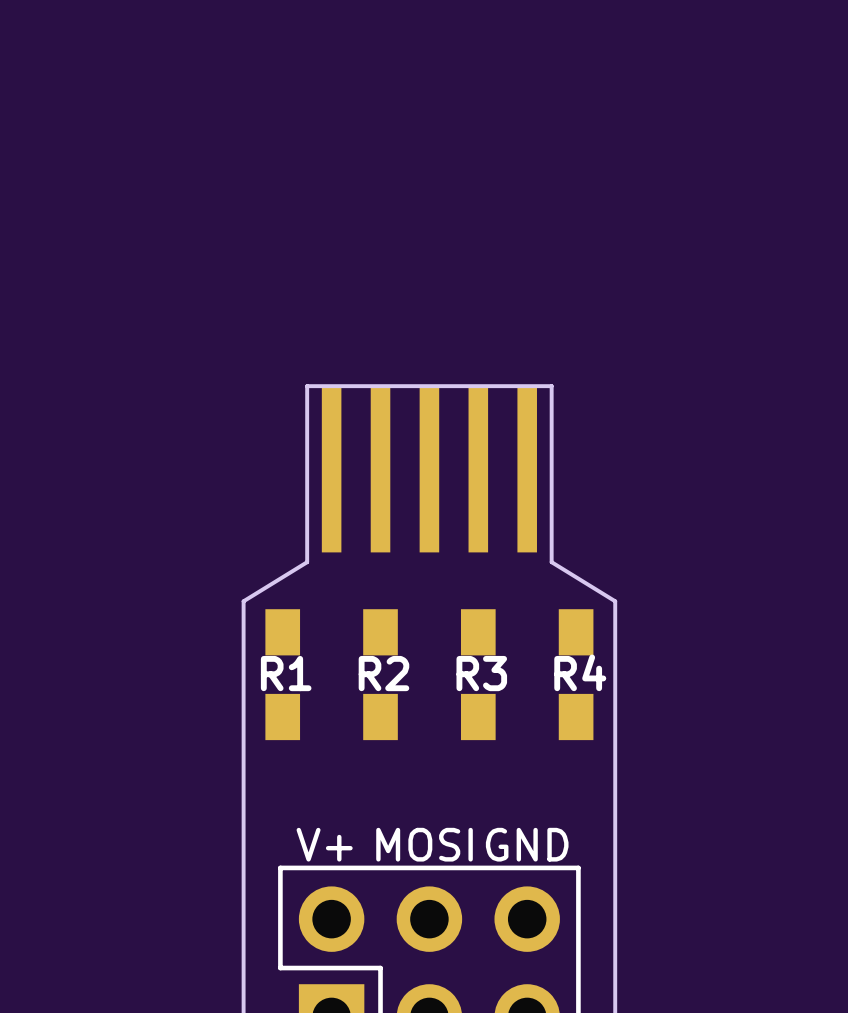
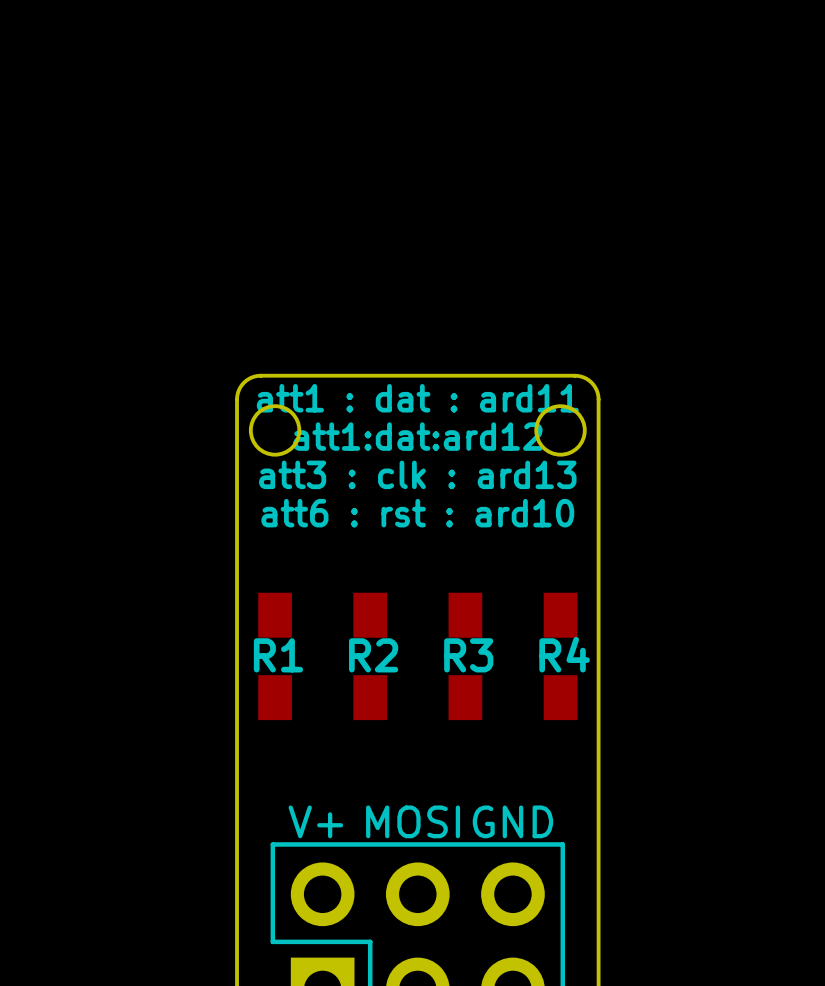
board edge: (307, 386) (307, 562) (243, 601) -> (298, 375) (254, 376) (243, 382) (237, 393) (237, 585)
board edge: (551, 386) (551, 562) (615, 601) -> (536, 375) (580, 376) (591, 382) (597, 393) (598, 585)
text: none -> att1 : dat : ard11 (417, 398)
round board edge: none -> [248, 404, 302, 457]
round board edge: none -> [534, 404, 587, 457]
text: none -> att1:dat:ard12 (417, 436)
part: (429, 469) -> none
text: none -> att3 : clk : ard13 (417, 474)
text: none -> att6 : rst : ard10 (417, 513)

